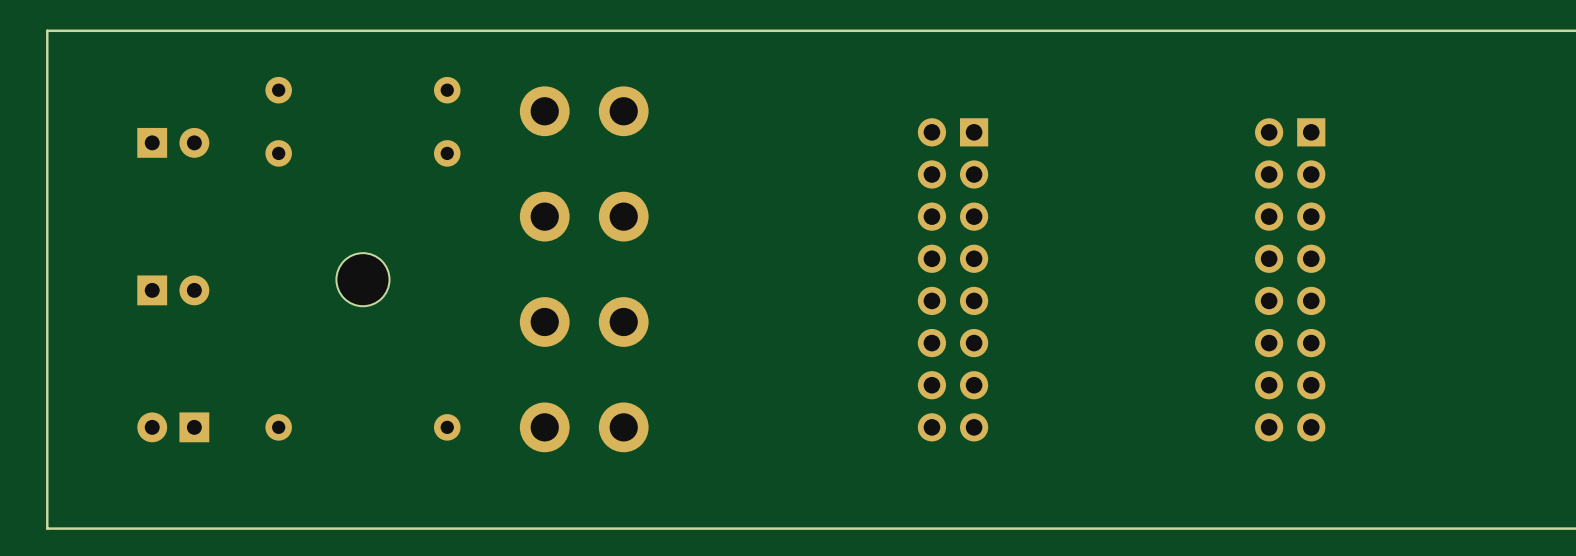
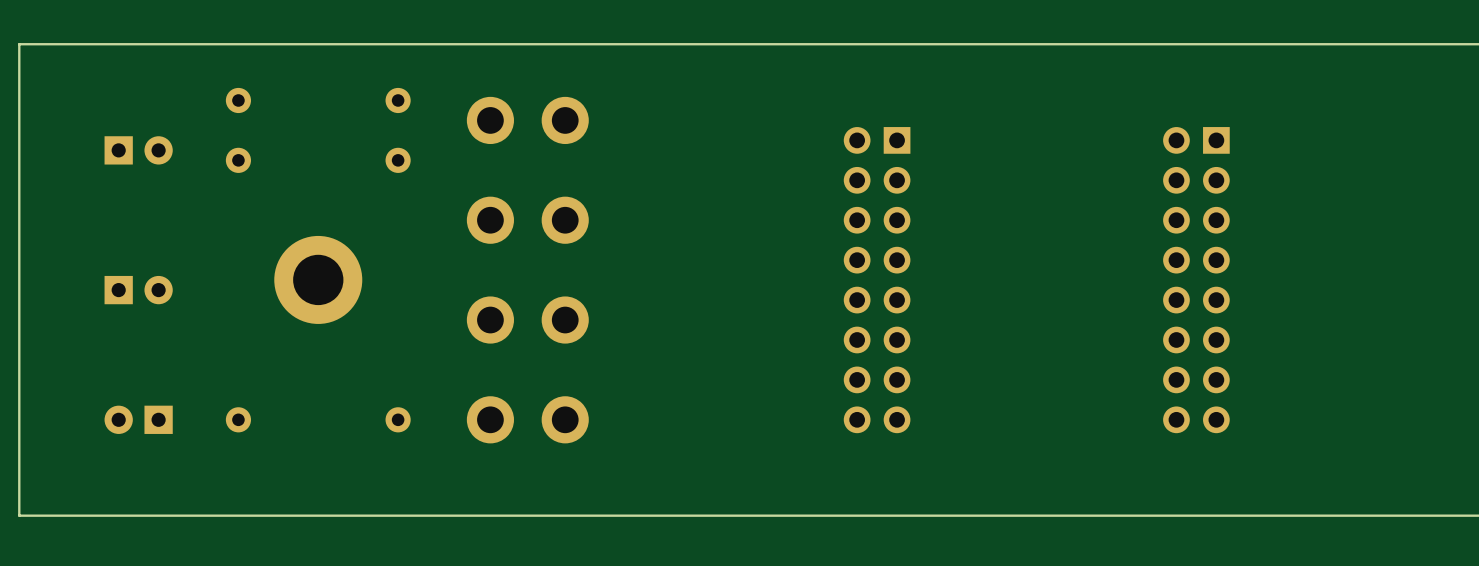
part footprint: [336, 253, 390, 307] -> [274, 235, 363, 324]

